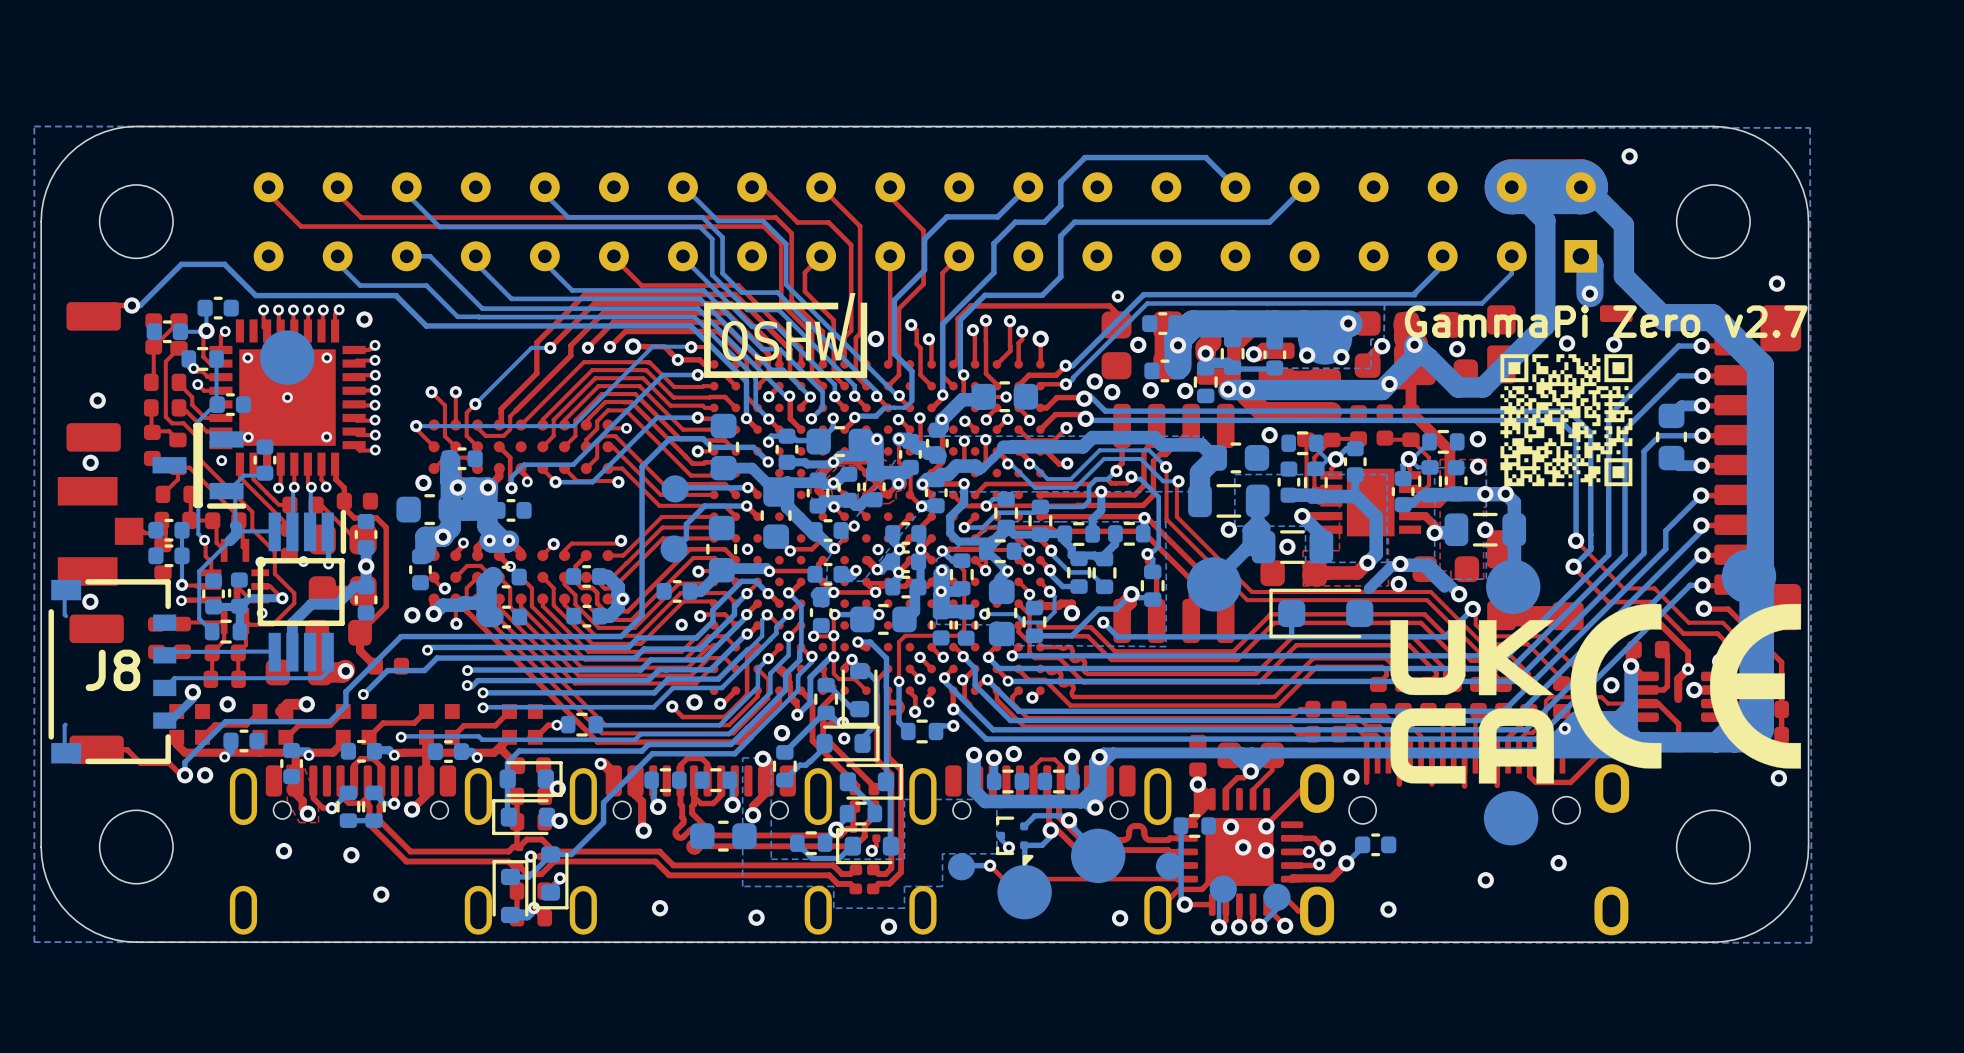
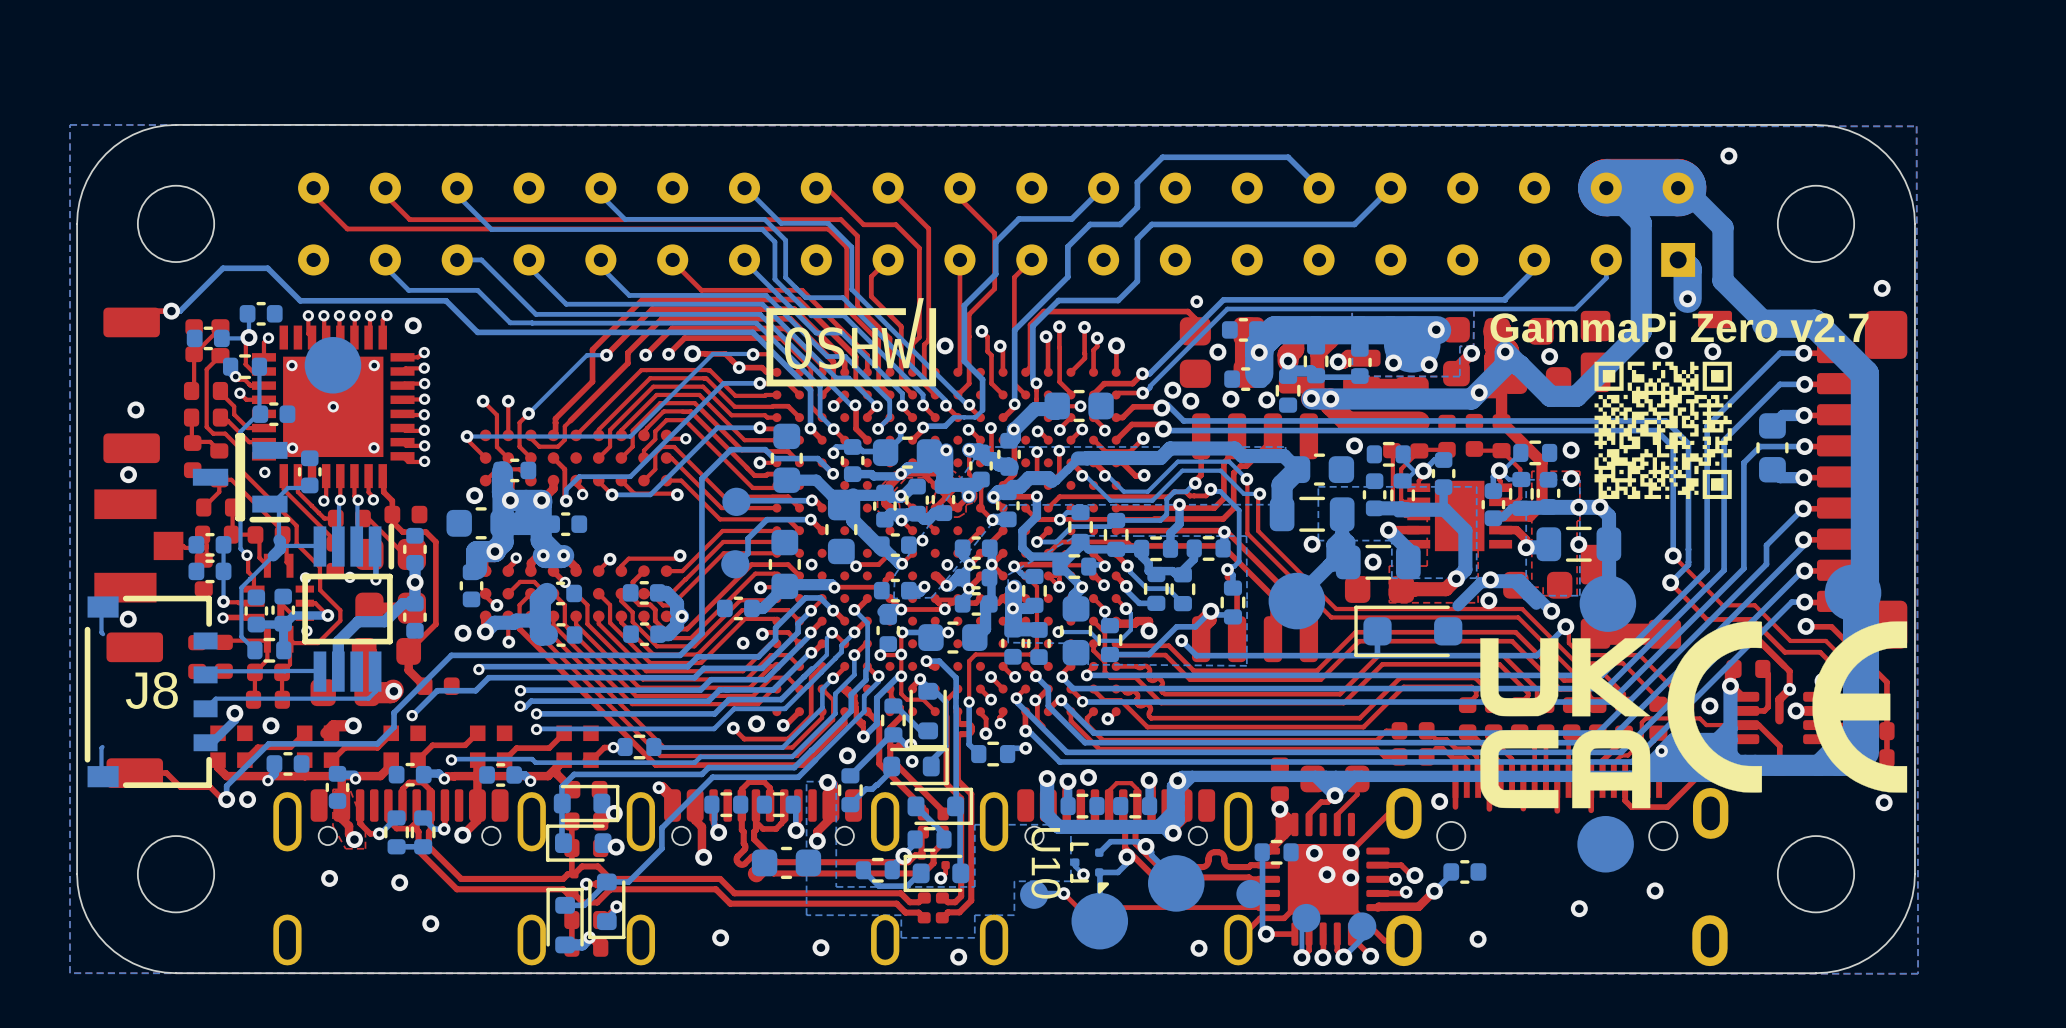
U10 name: none -> U10 (1045, 863)

